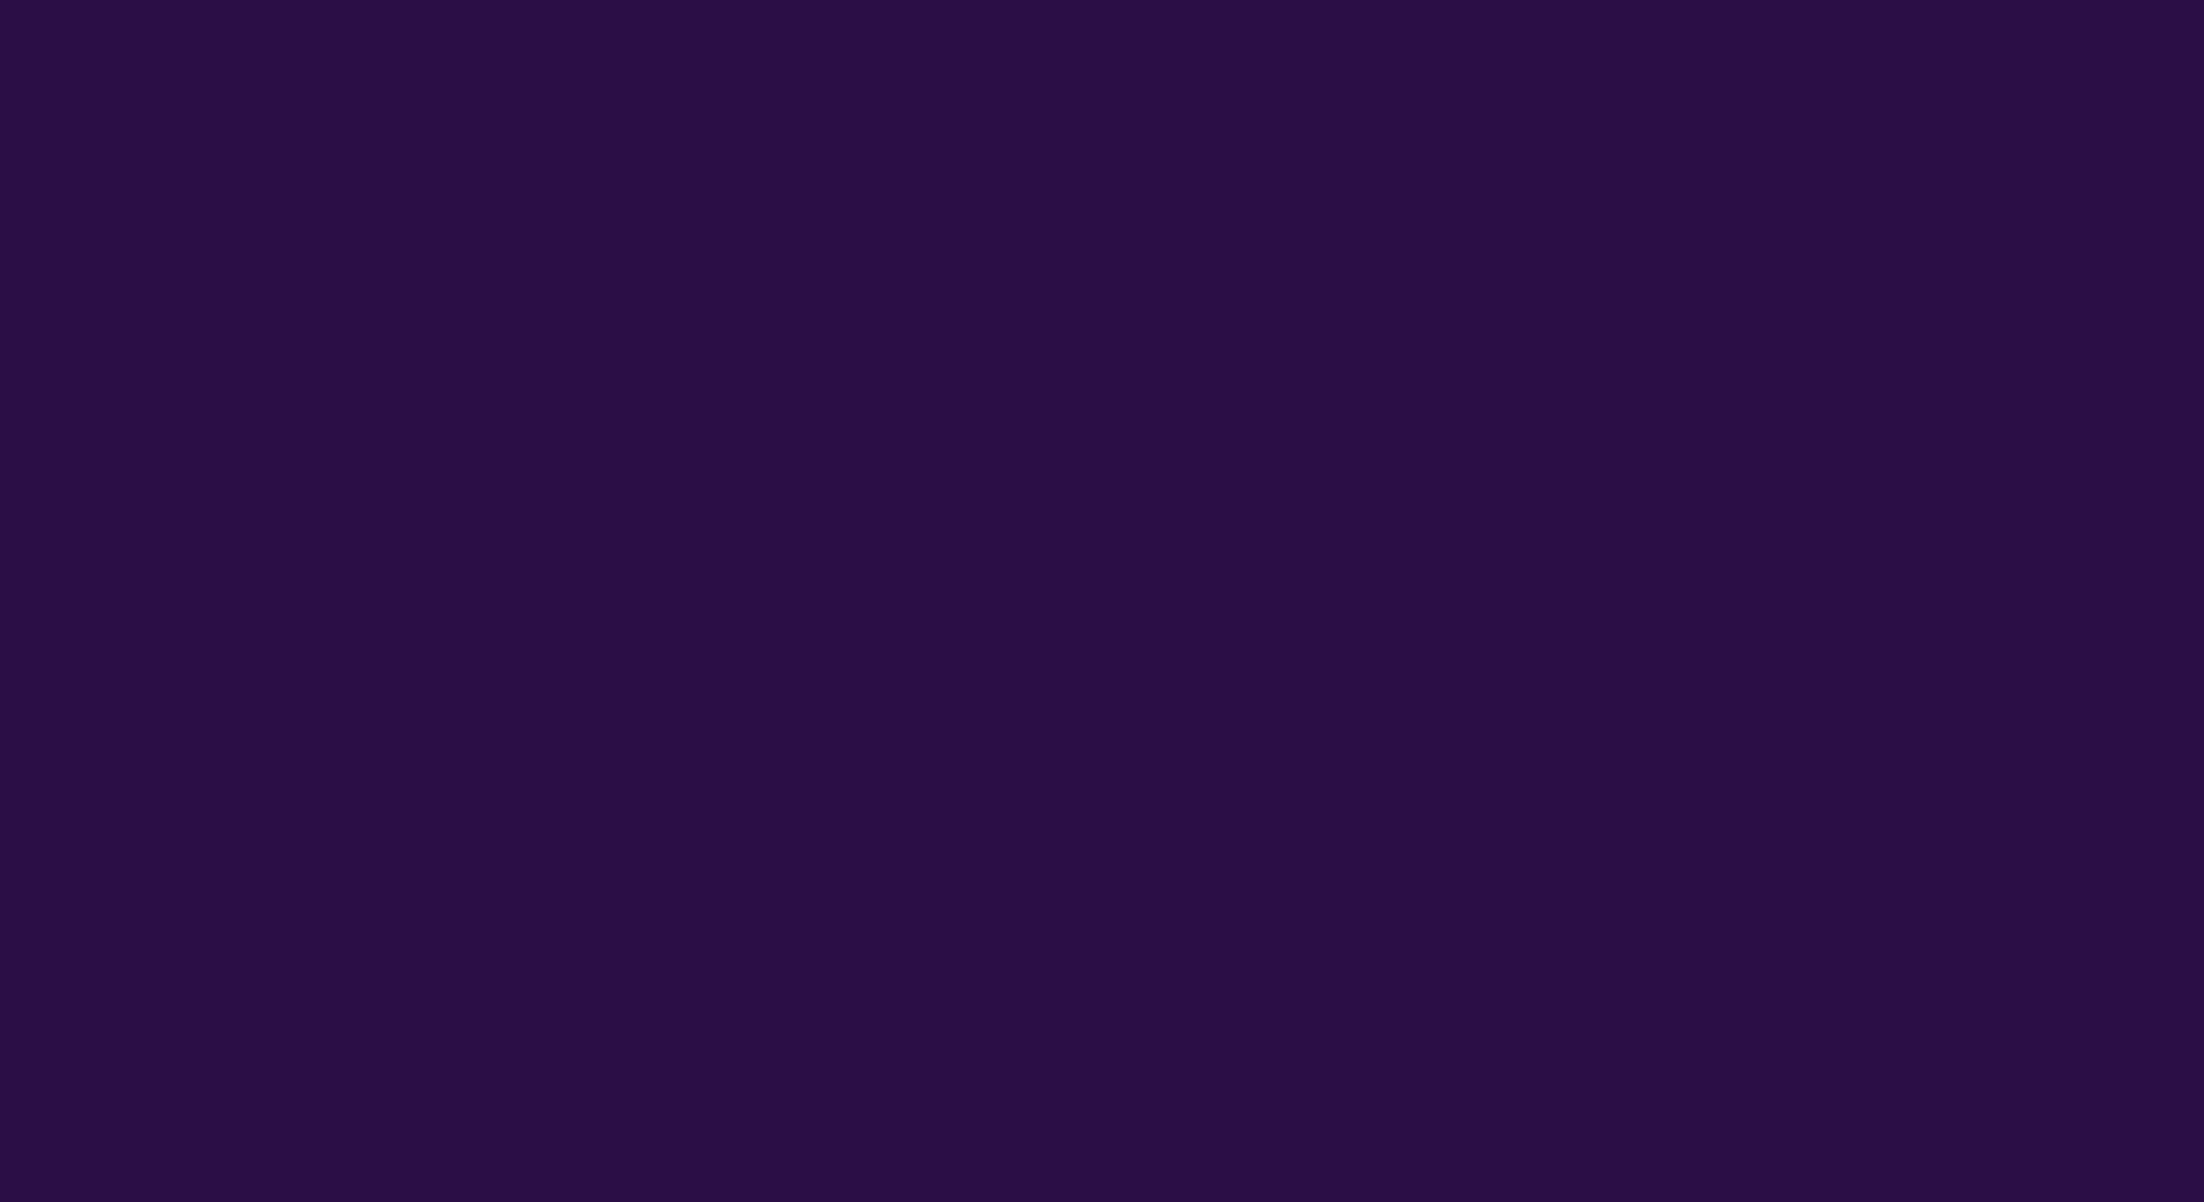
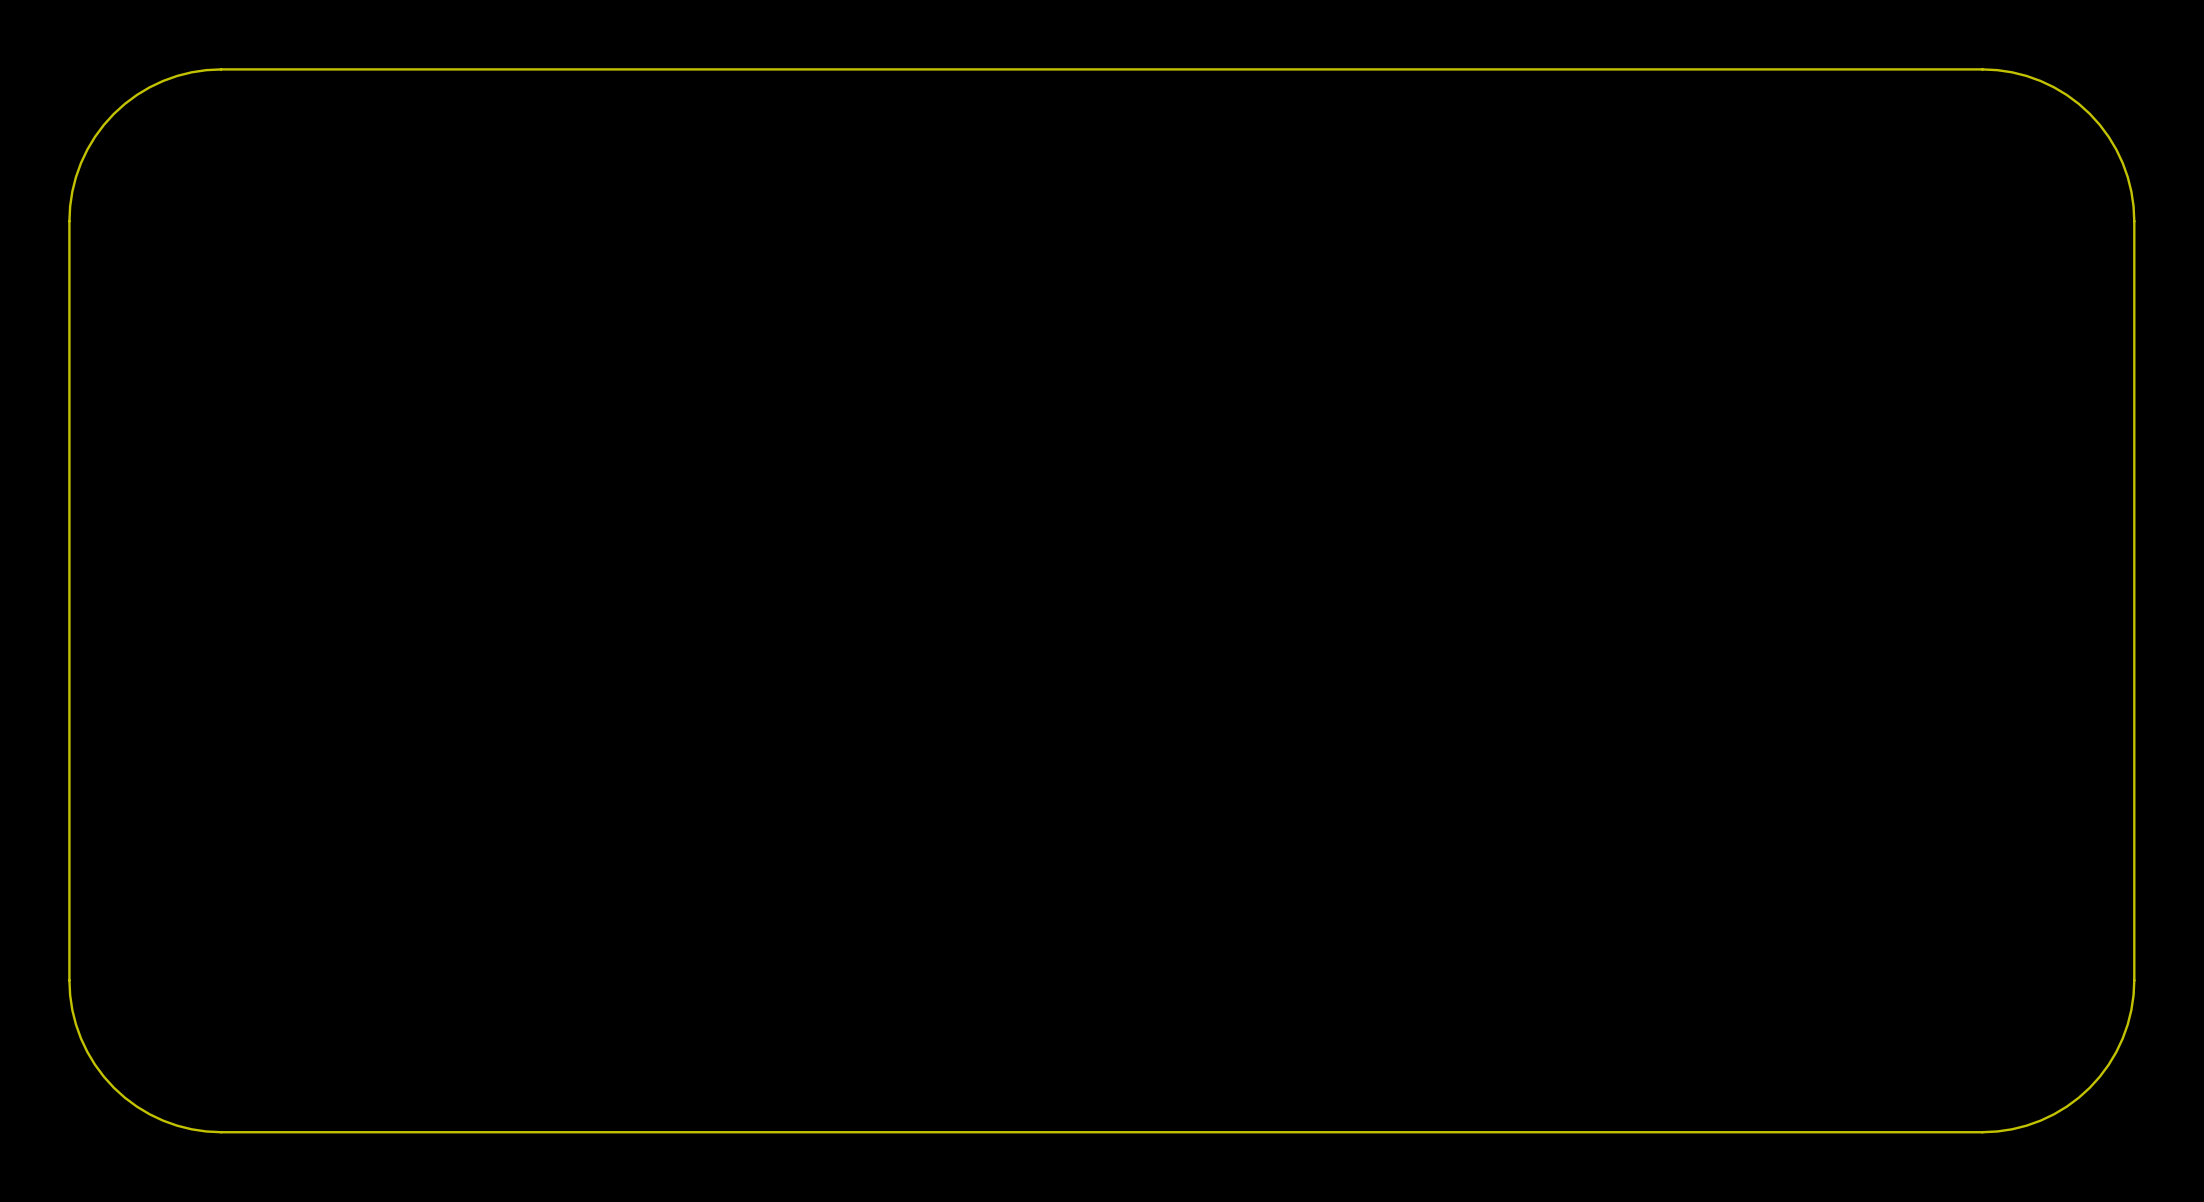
board edge: none -> (221, 69) (1982, 69) (2026, 75) (2054, 87) (2089, 113) (2108, 136) (2127, 177) (2133, 206) (2134, 980) (2127, 1024) (2116, 1051) (2089, 1087) (2066, 1106) (2026, 1125) (1982, 1132) (221, 1132) (191, 1129) (149, 1114) (113, 1087) (94, 1064) (75, 1024) (70, 995) (70, 206) (75, 177) (87, 149) (103, 124) (124, 103) (149, 87) (177, 75) (221, 69)

